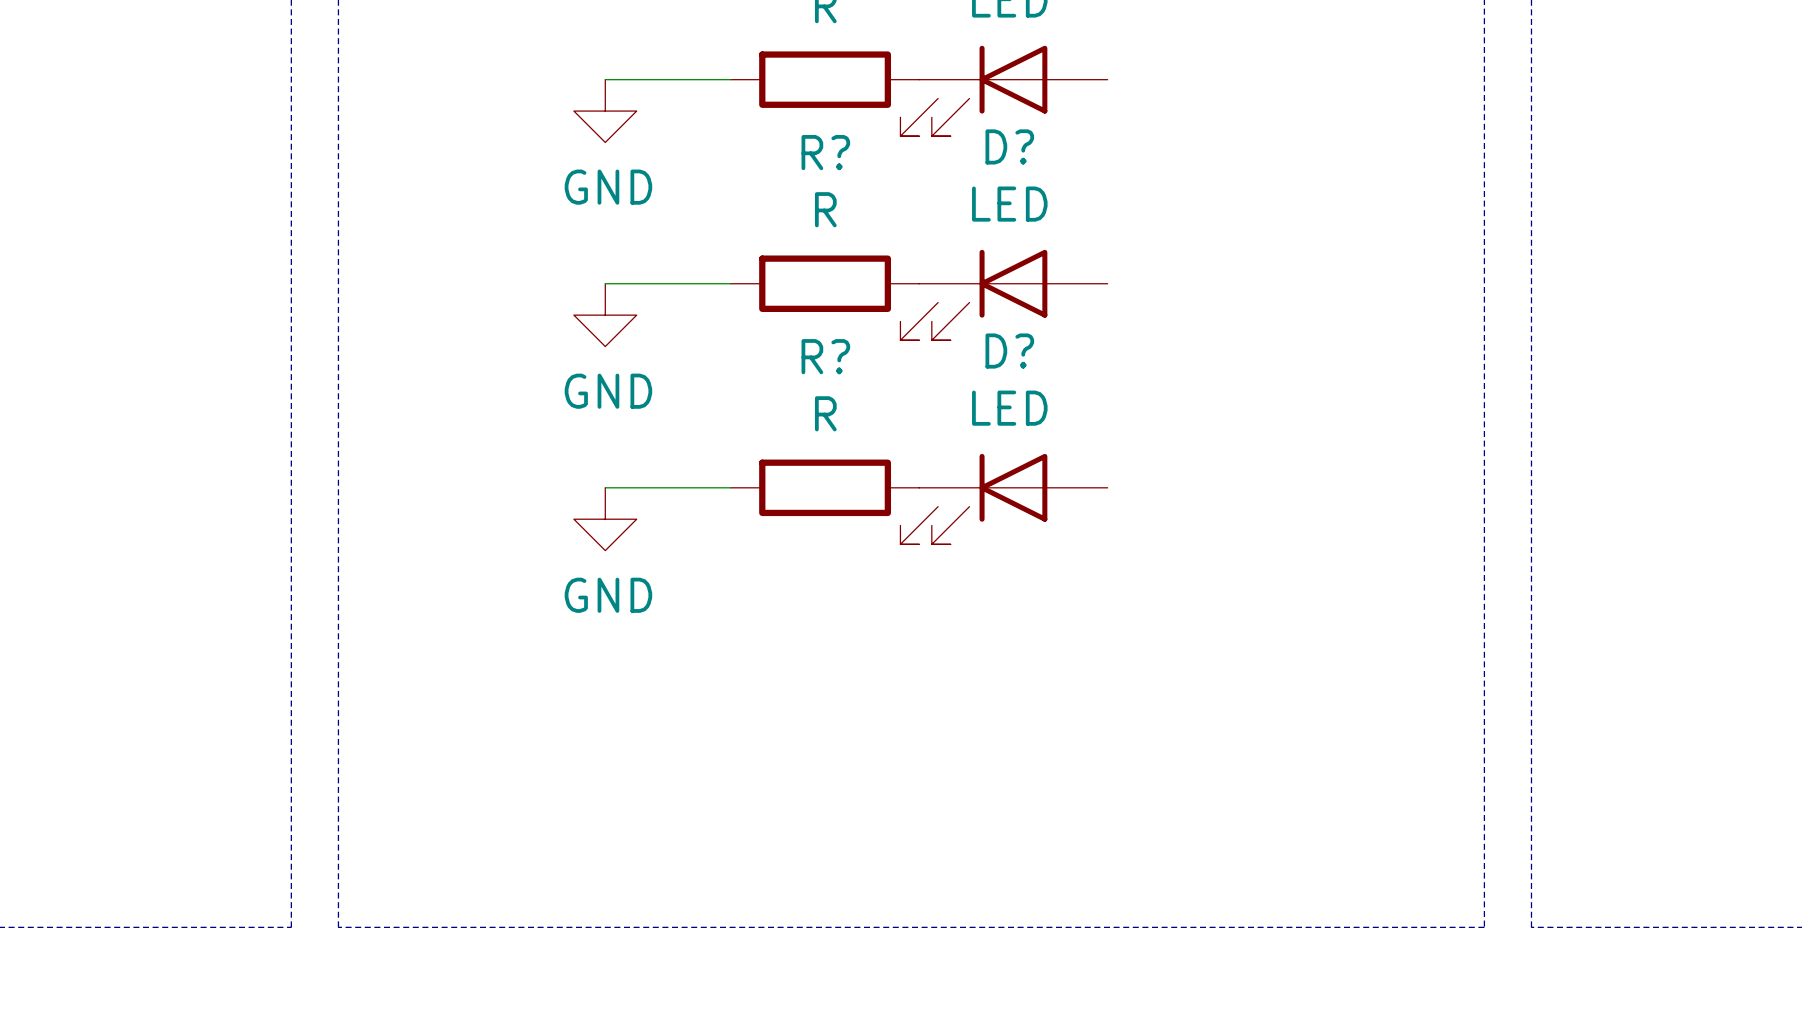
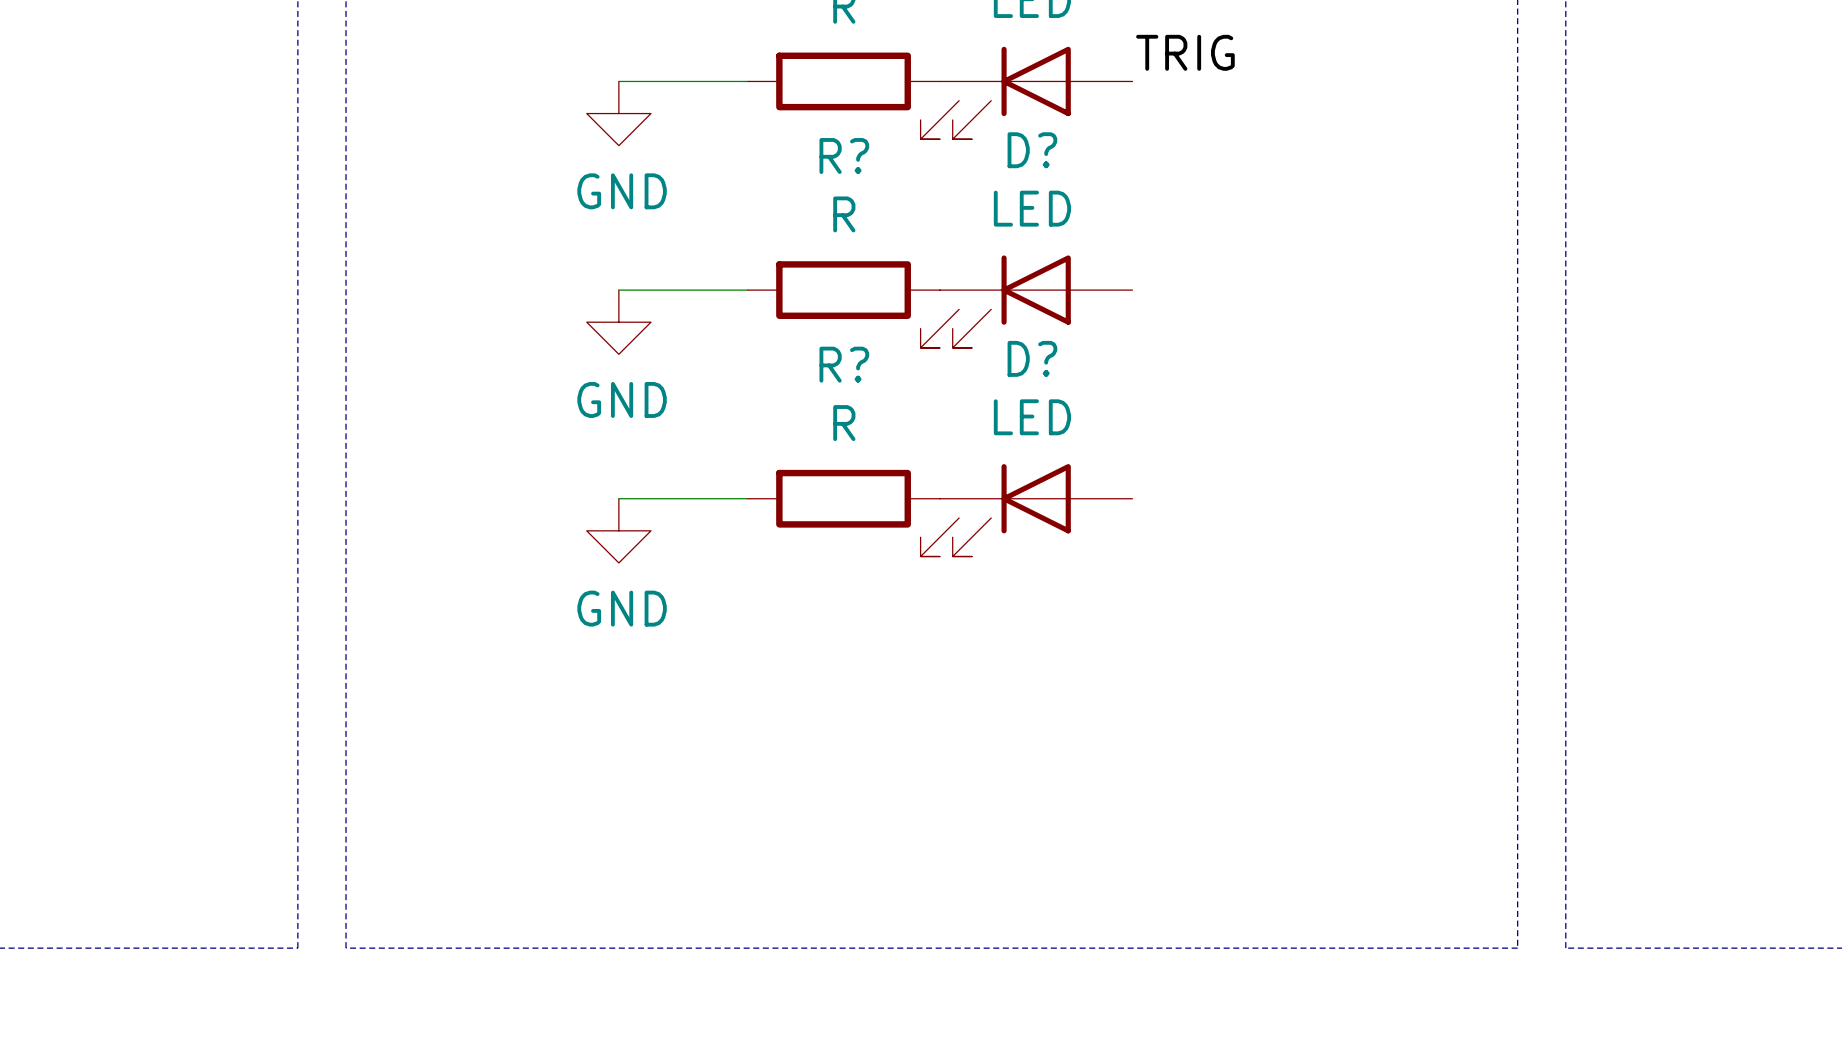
label: none -> TRIG (1185, 52)

